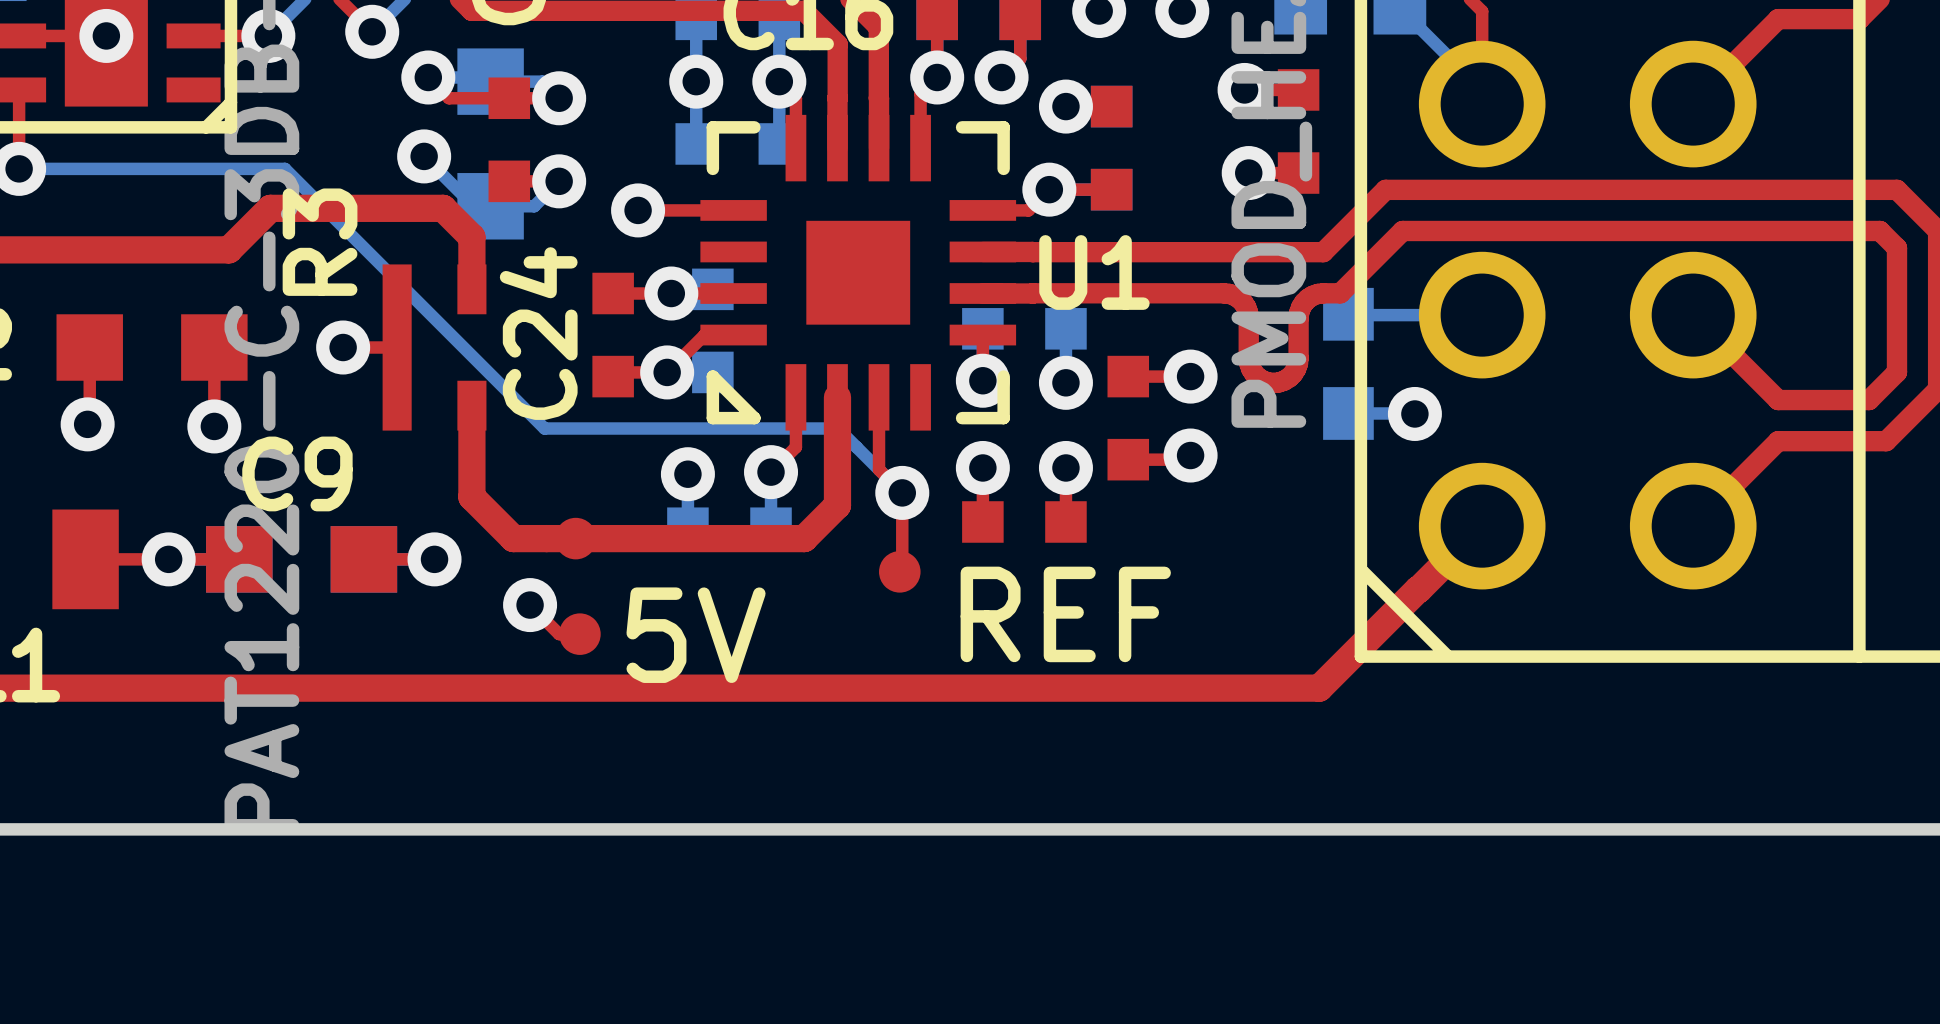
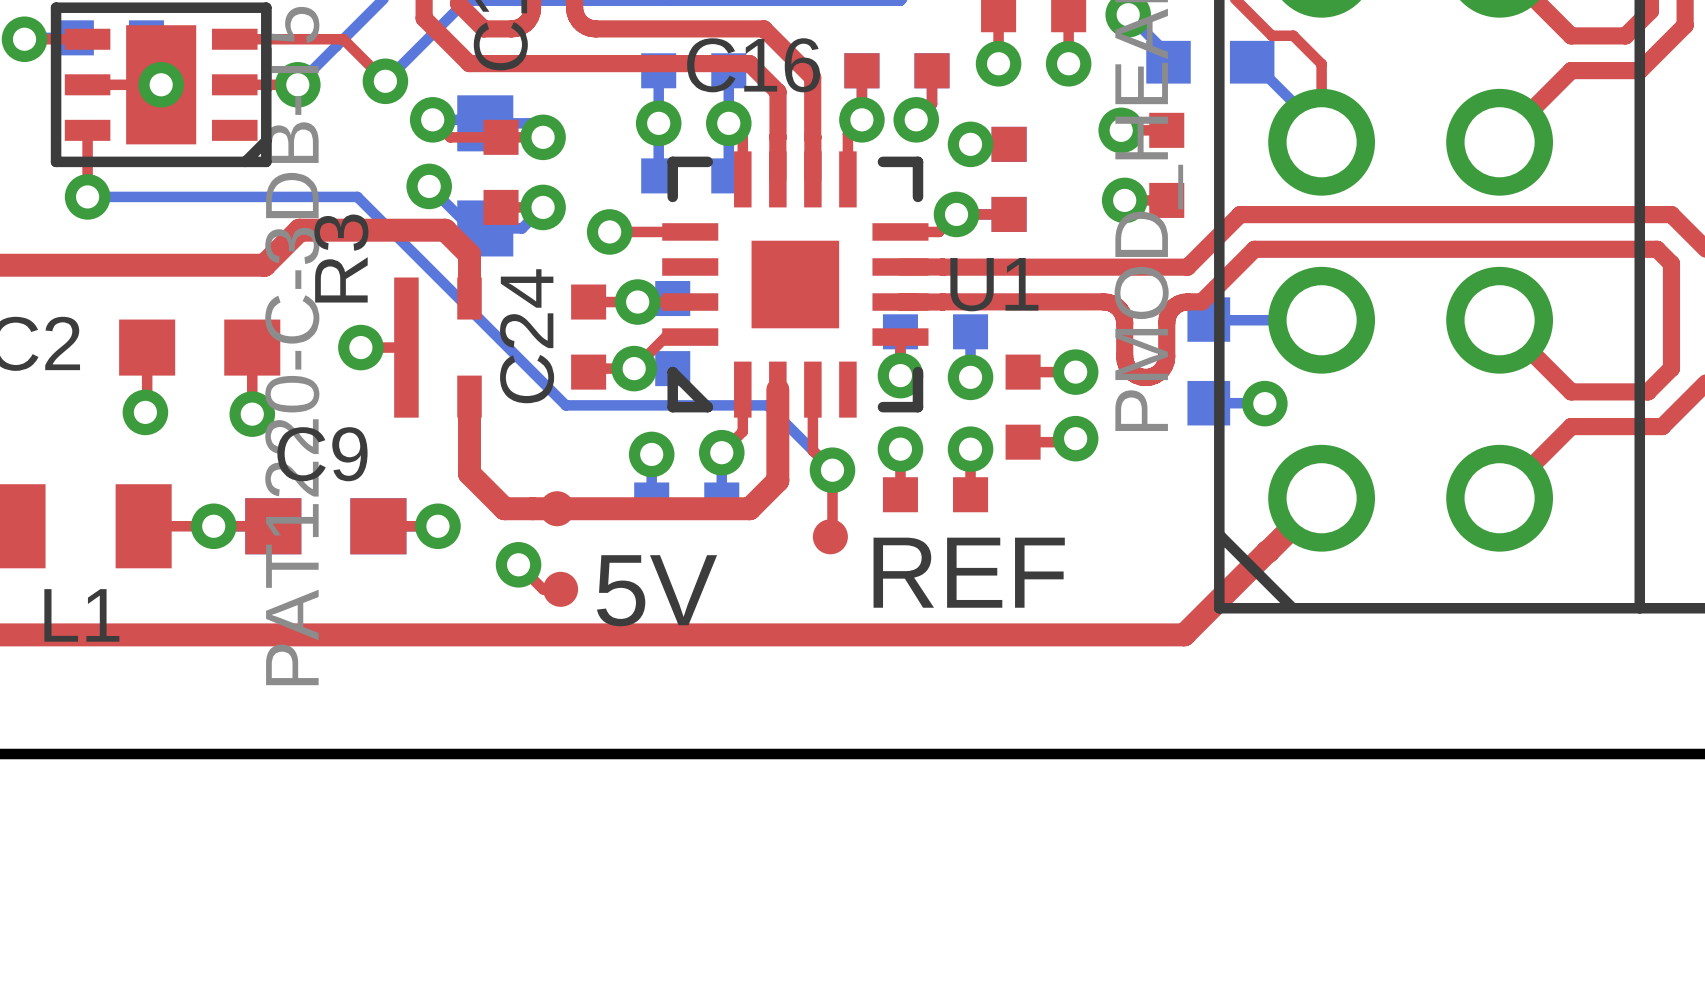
bottom track: (284, 168) (544, 428) (837, 428) -> (311, 196) (357, 196) (565, 405) (767, 405) (778, 415)

